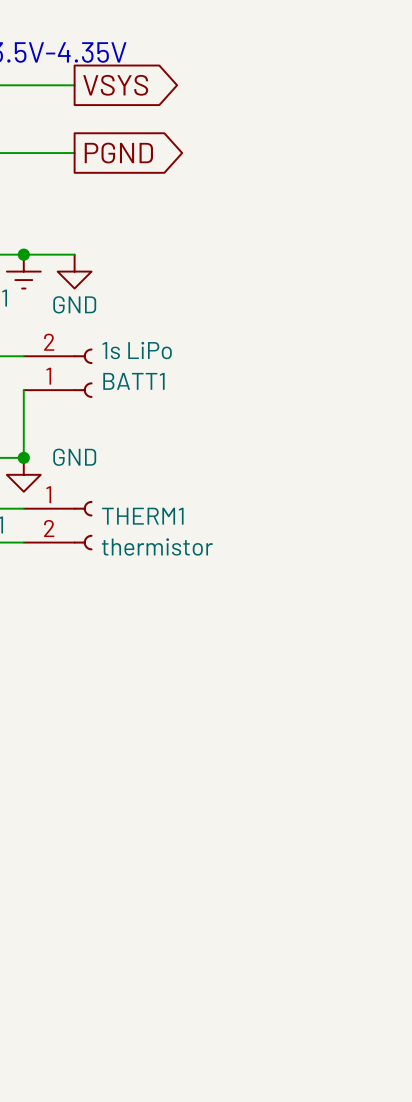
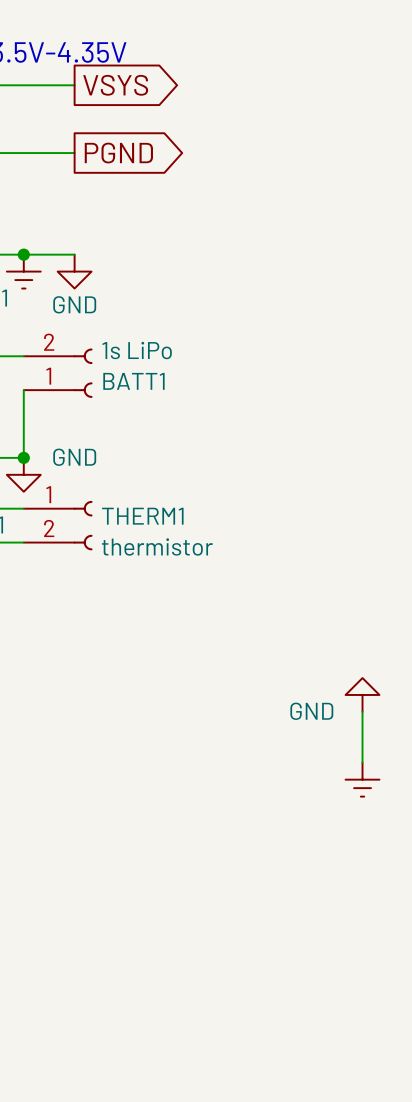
power symbol: none -> GND (362, 694)
wire: none -> (362, 711) (362, 762)
power symbol: none -> (362, 779)

